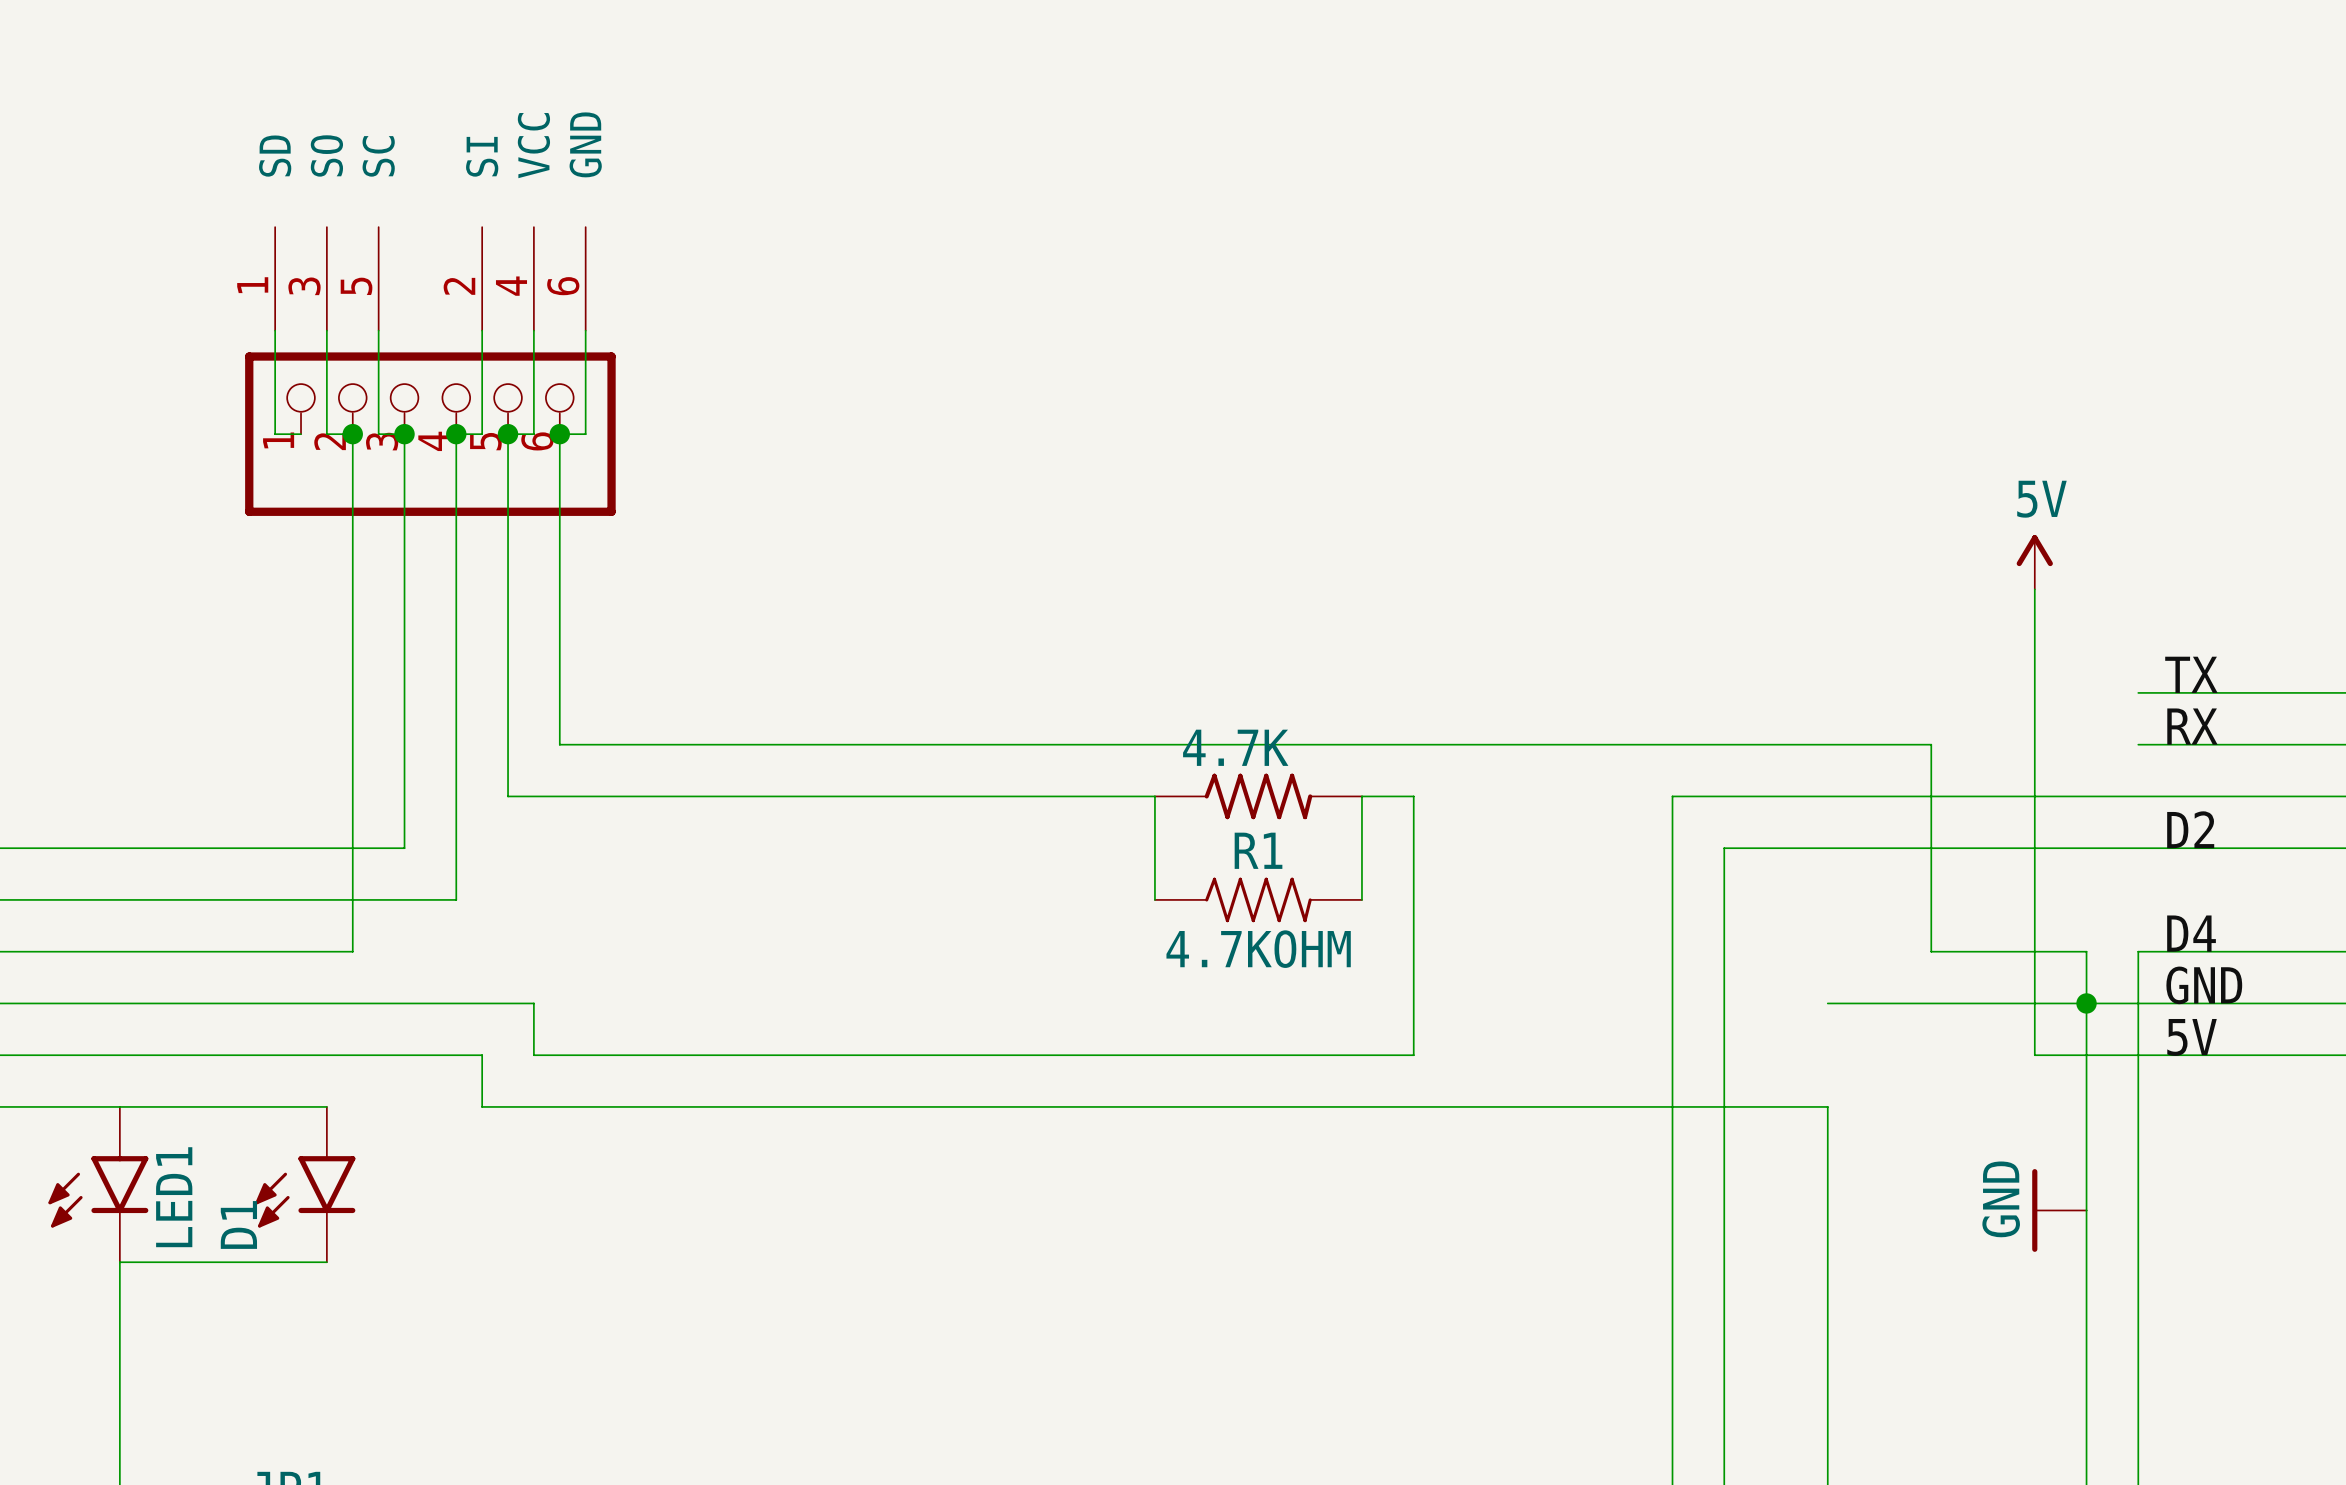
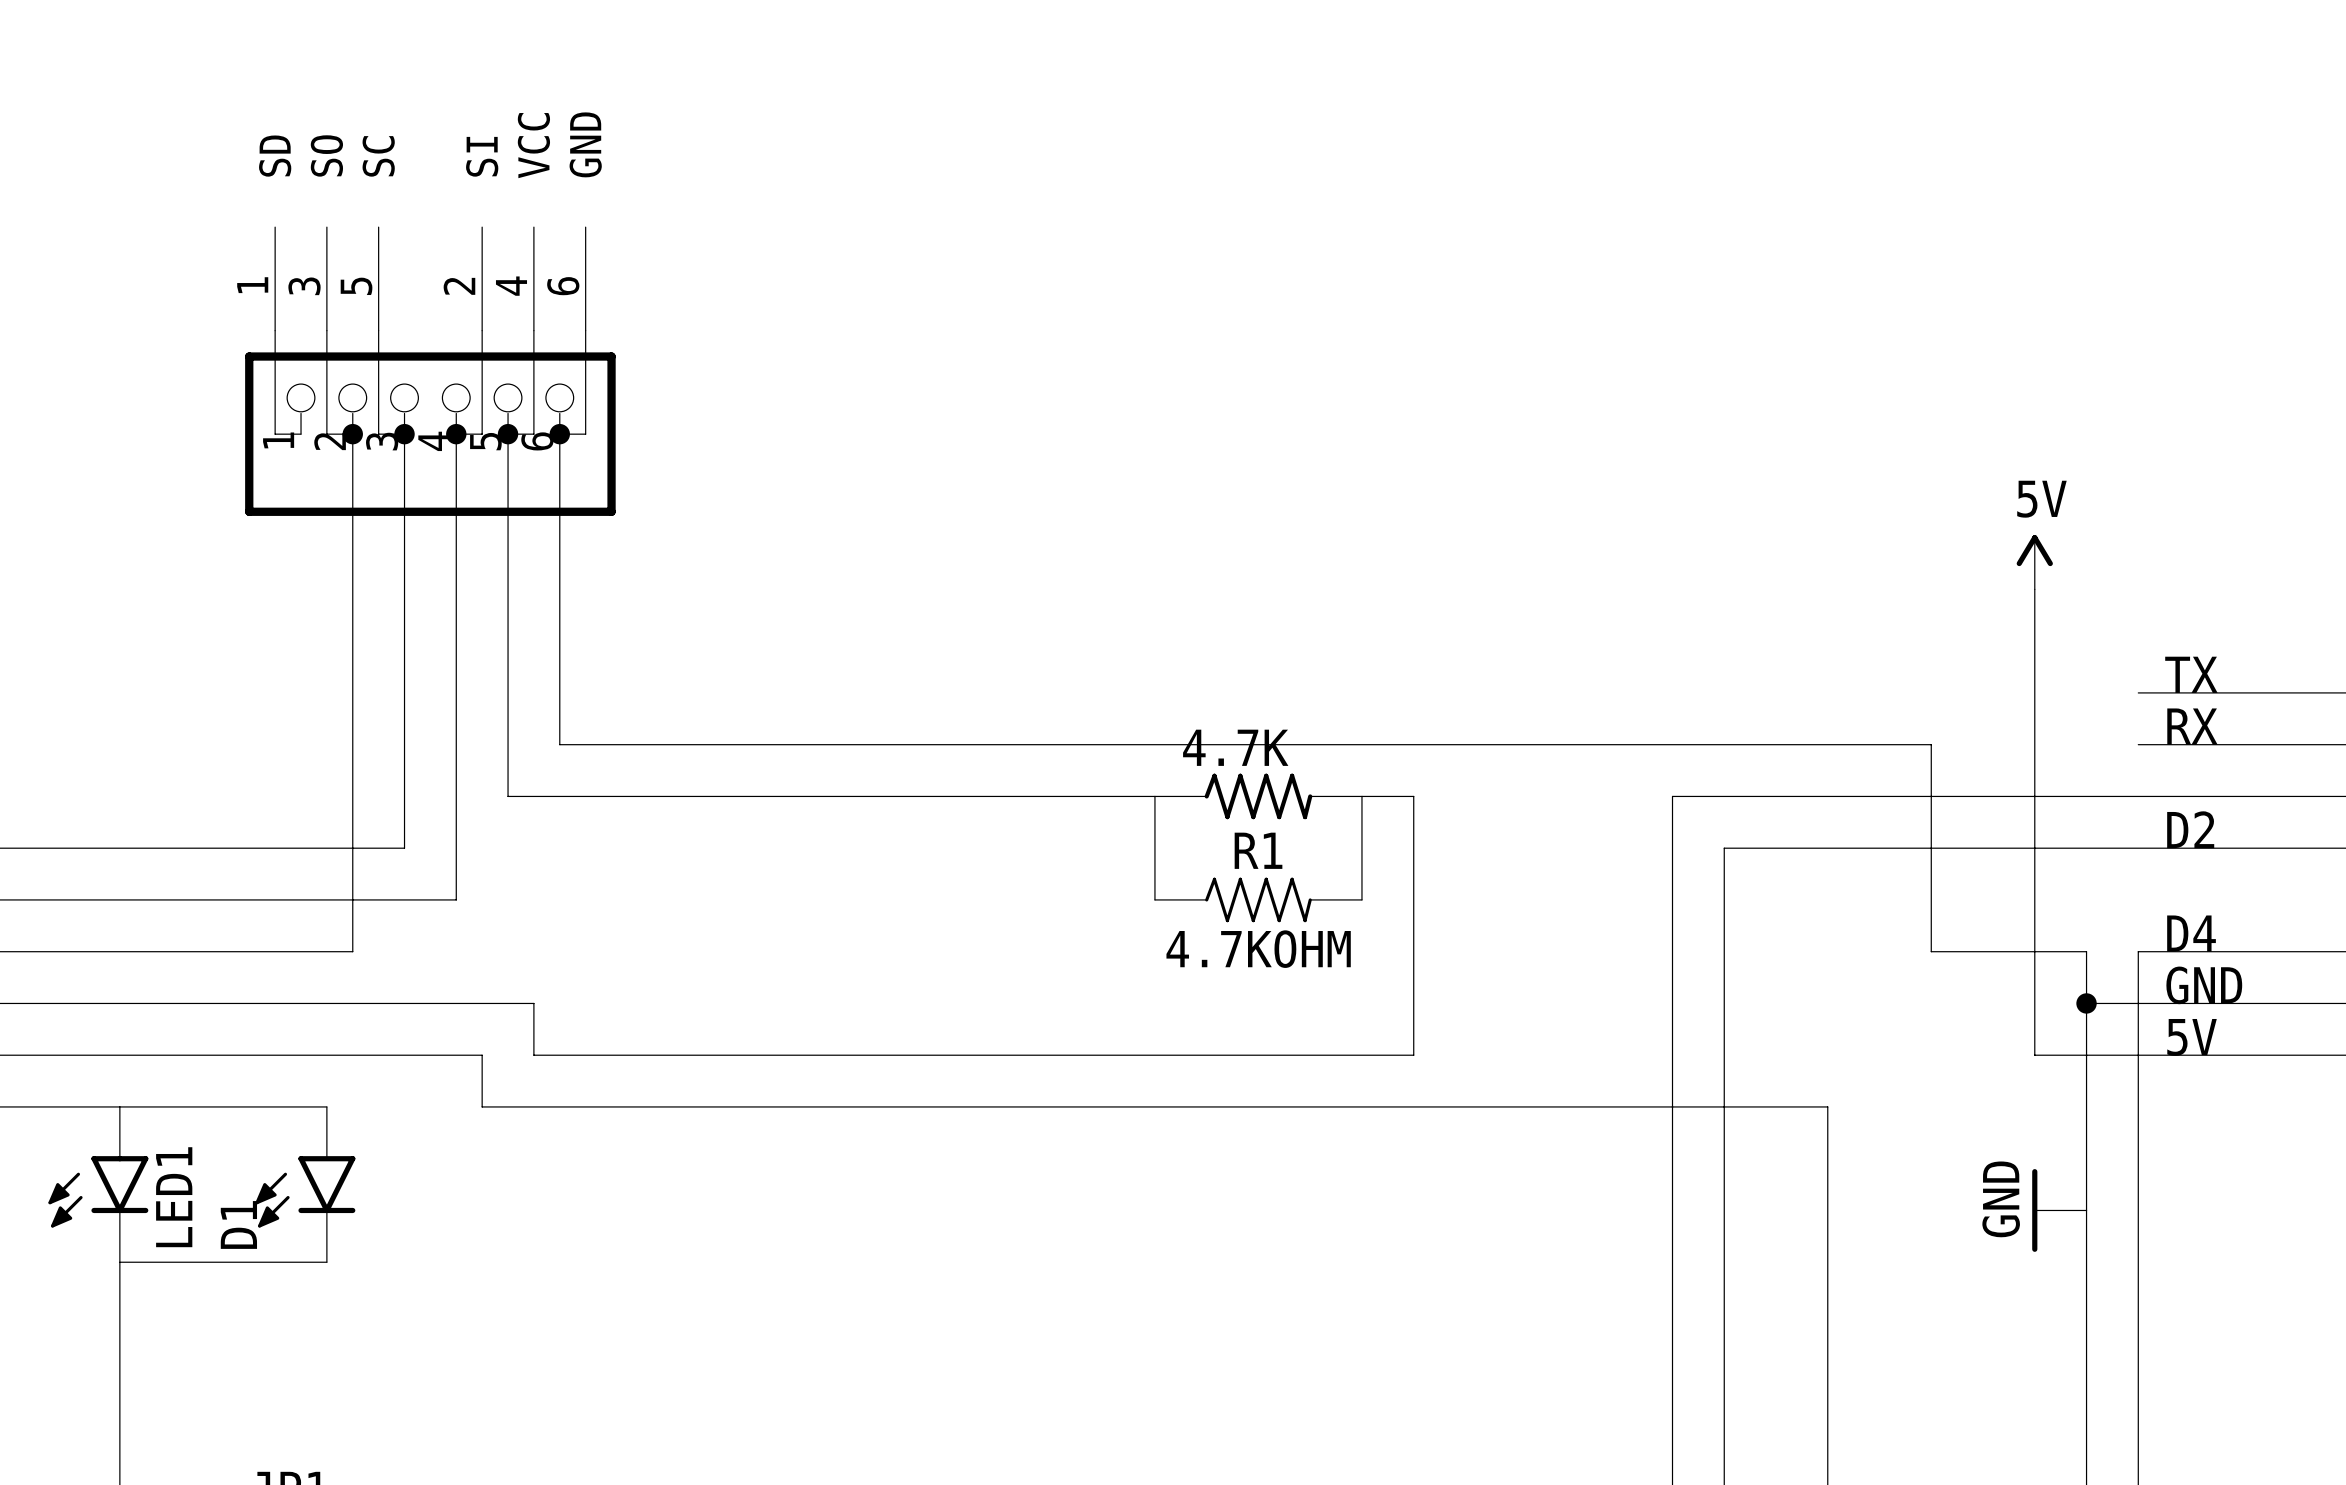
wire: (1827, 1003) (2086, 1003) -> none

